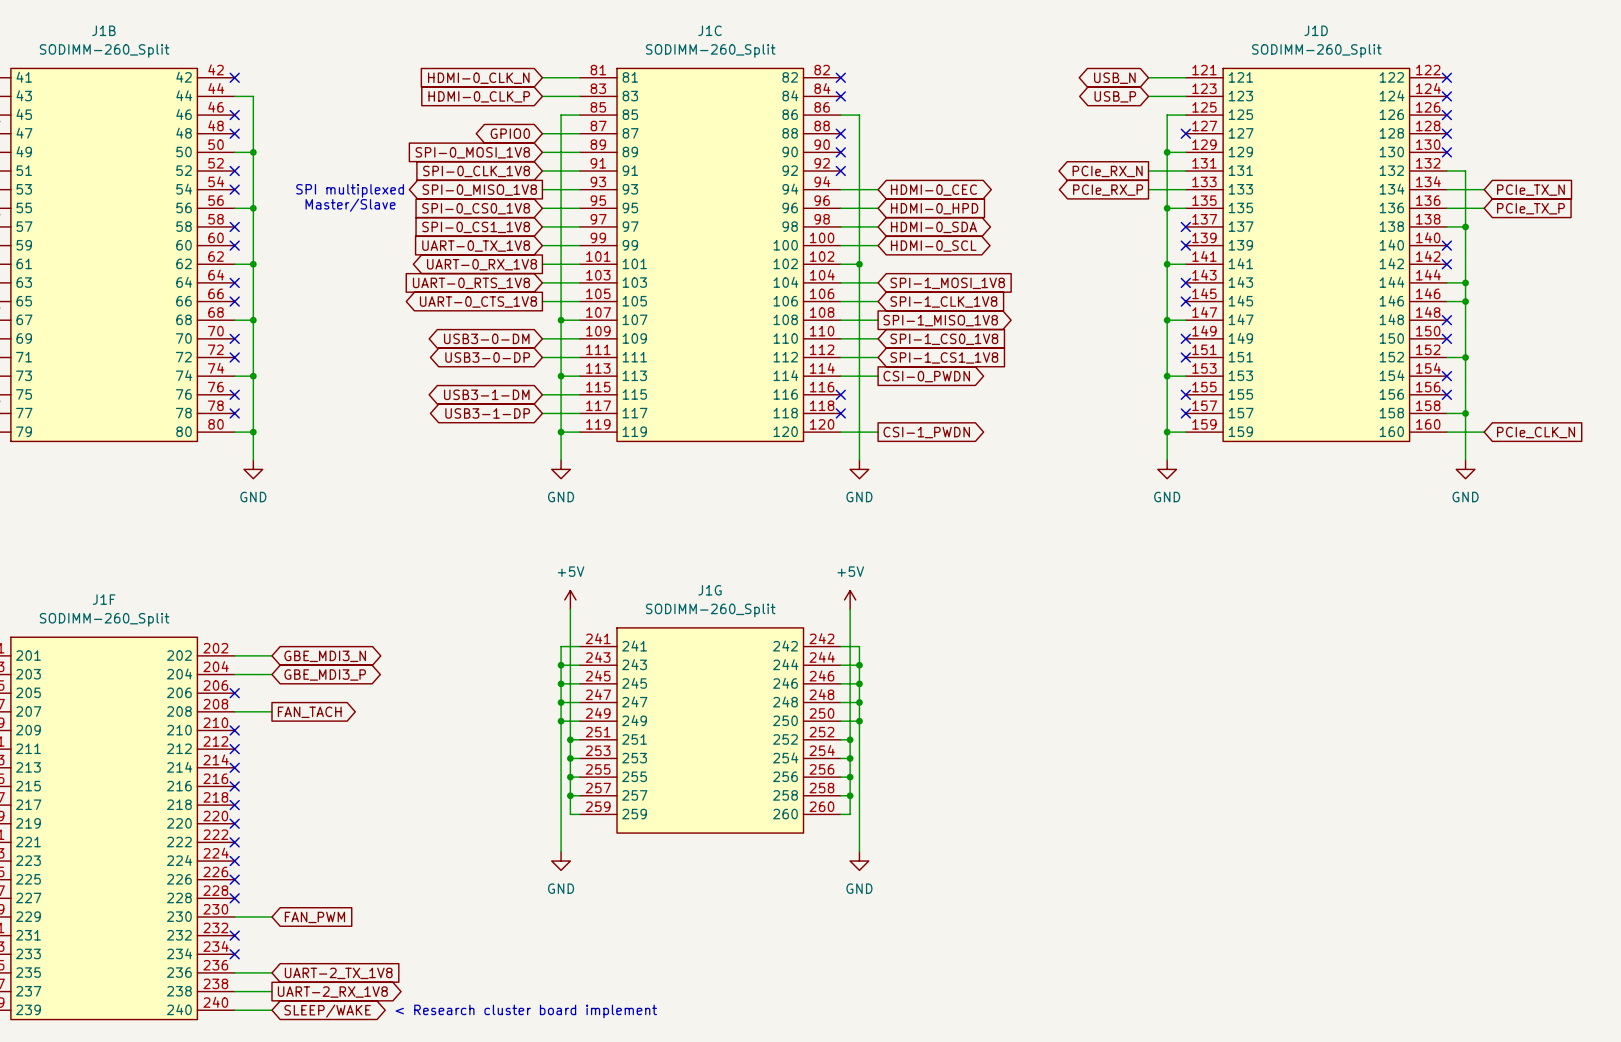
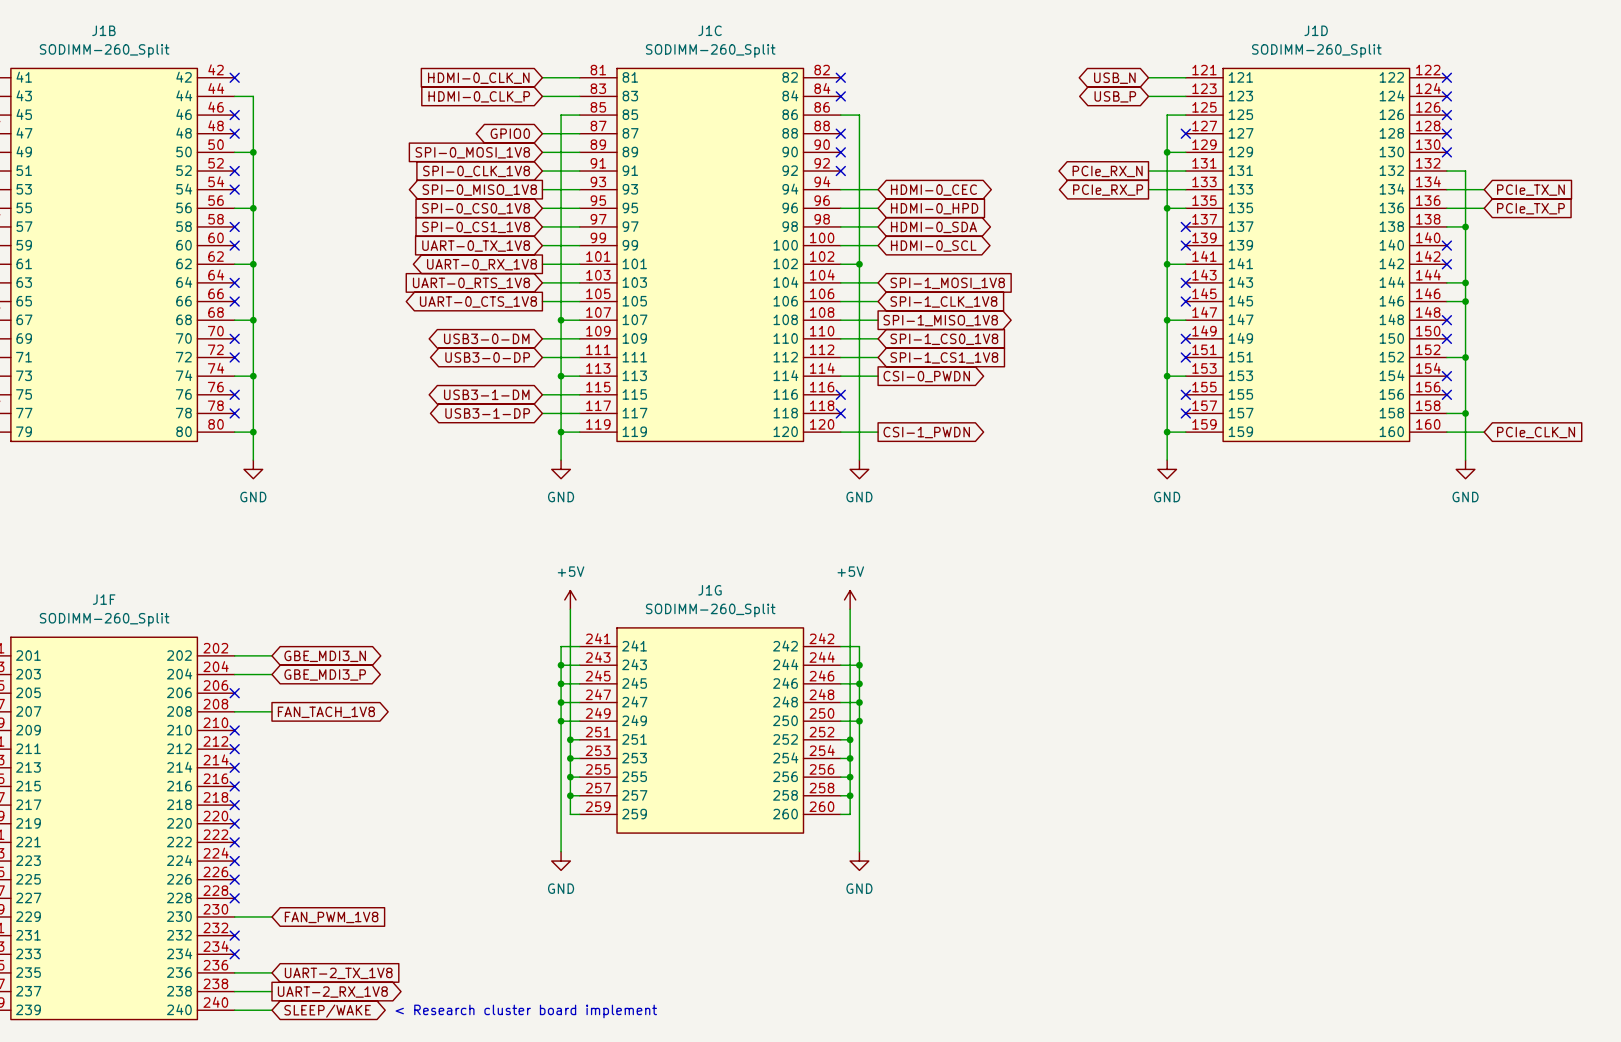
text: SPI multiplexed (350, 190) -> none
text: Master/Slave (350, 205) -> none
global label: FAN_TACH (309, 712) -> FAN_TACH_1V8 (326, 712)
global label: FAN_PWM (314, 917) -> FAN_PWM_1V8 (331, 917)

